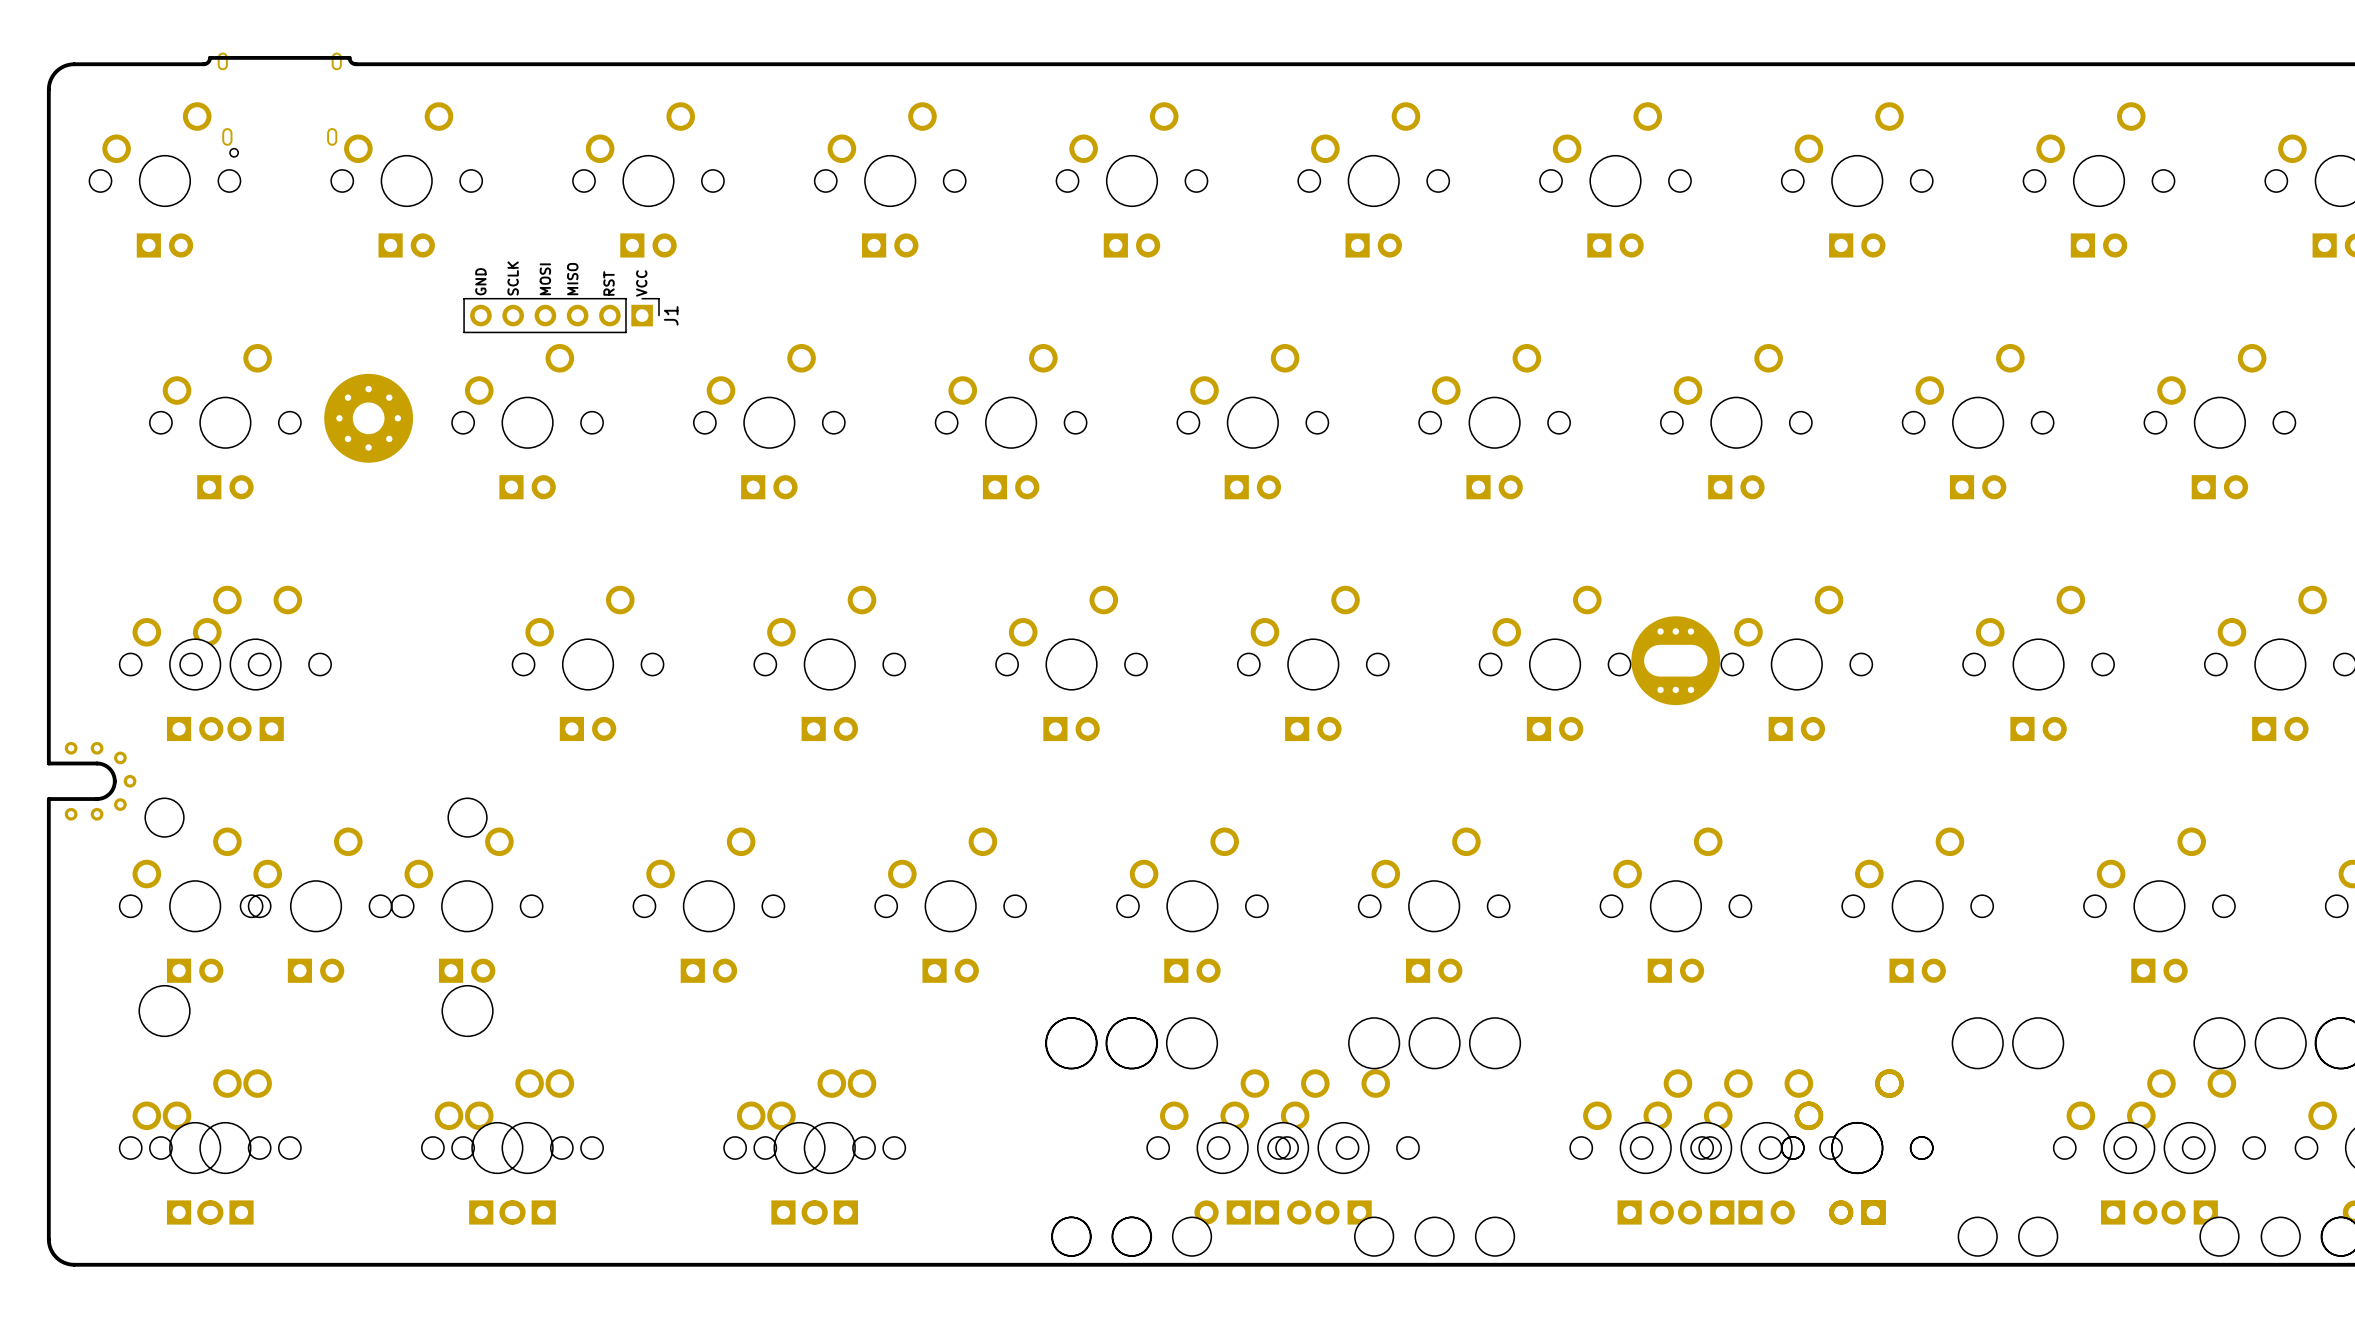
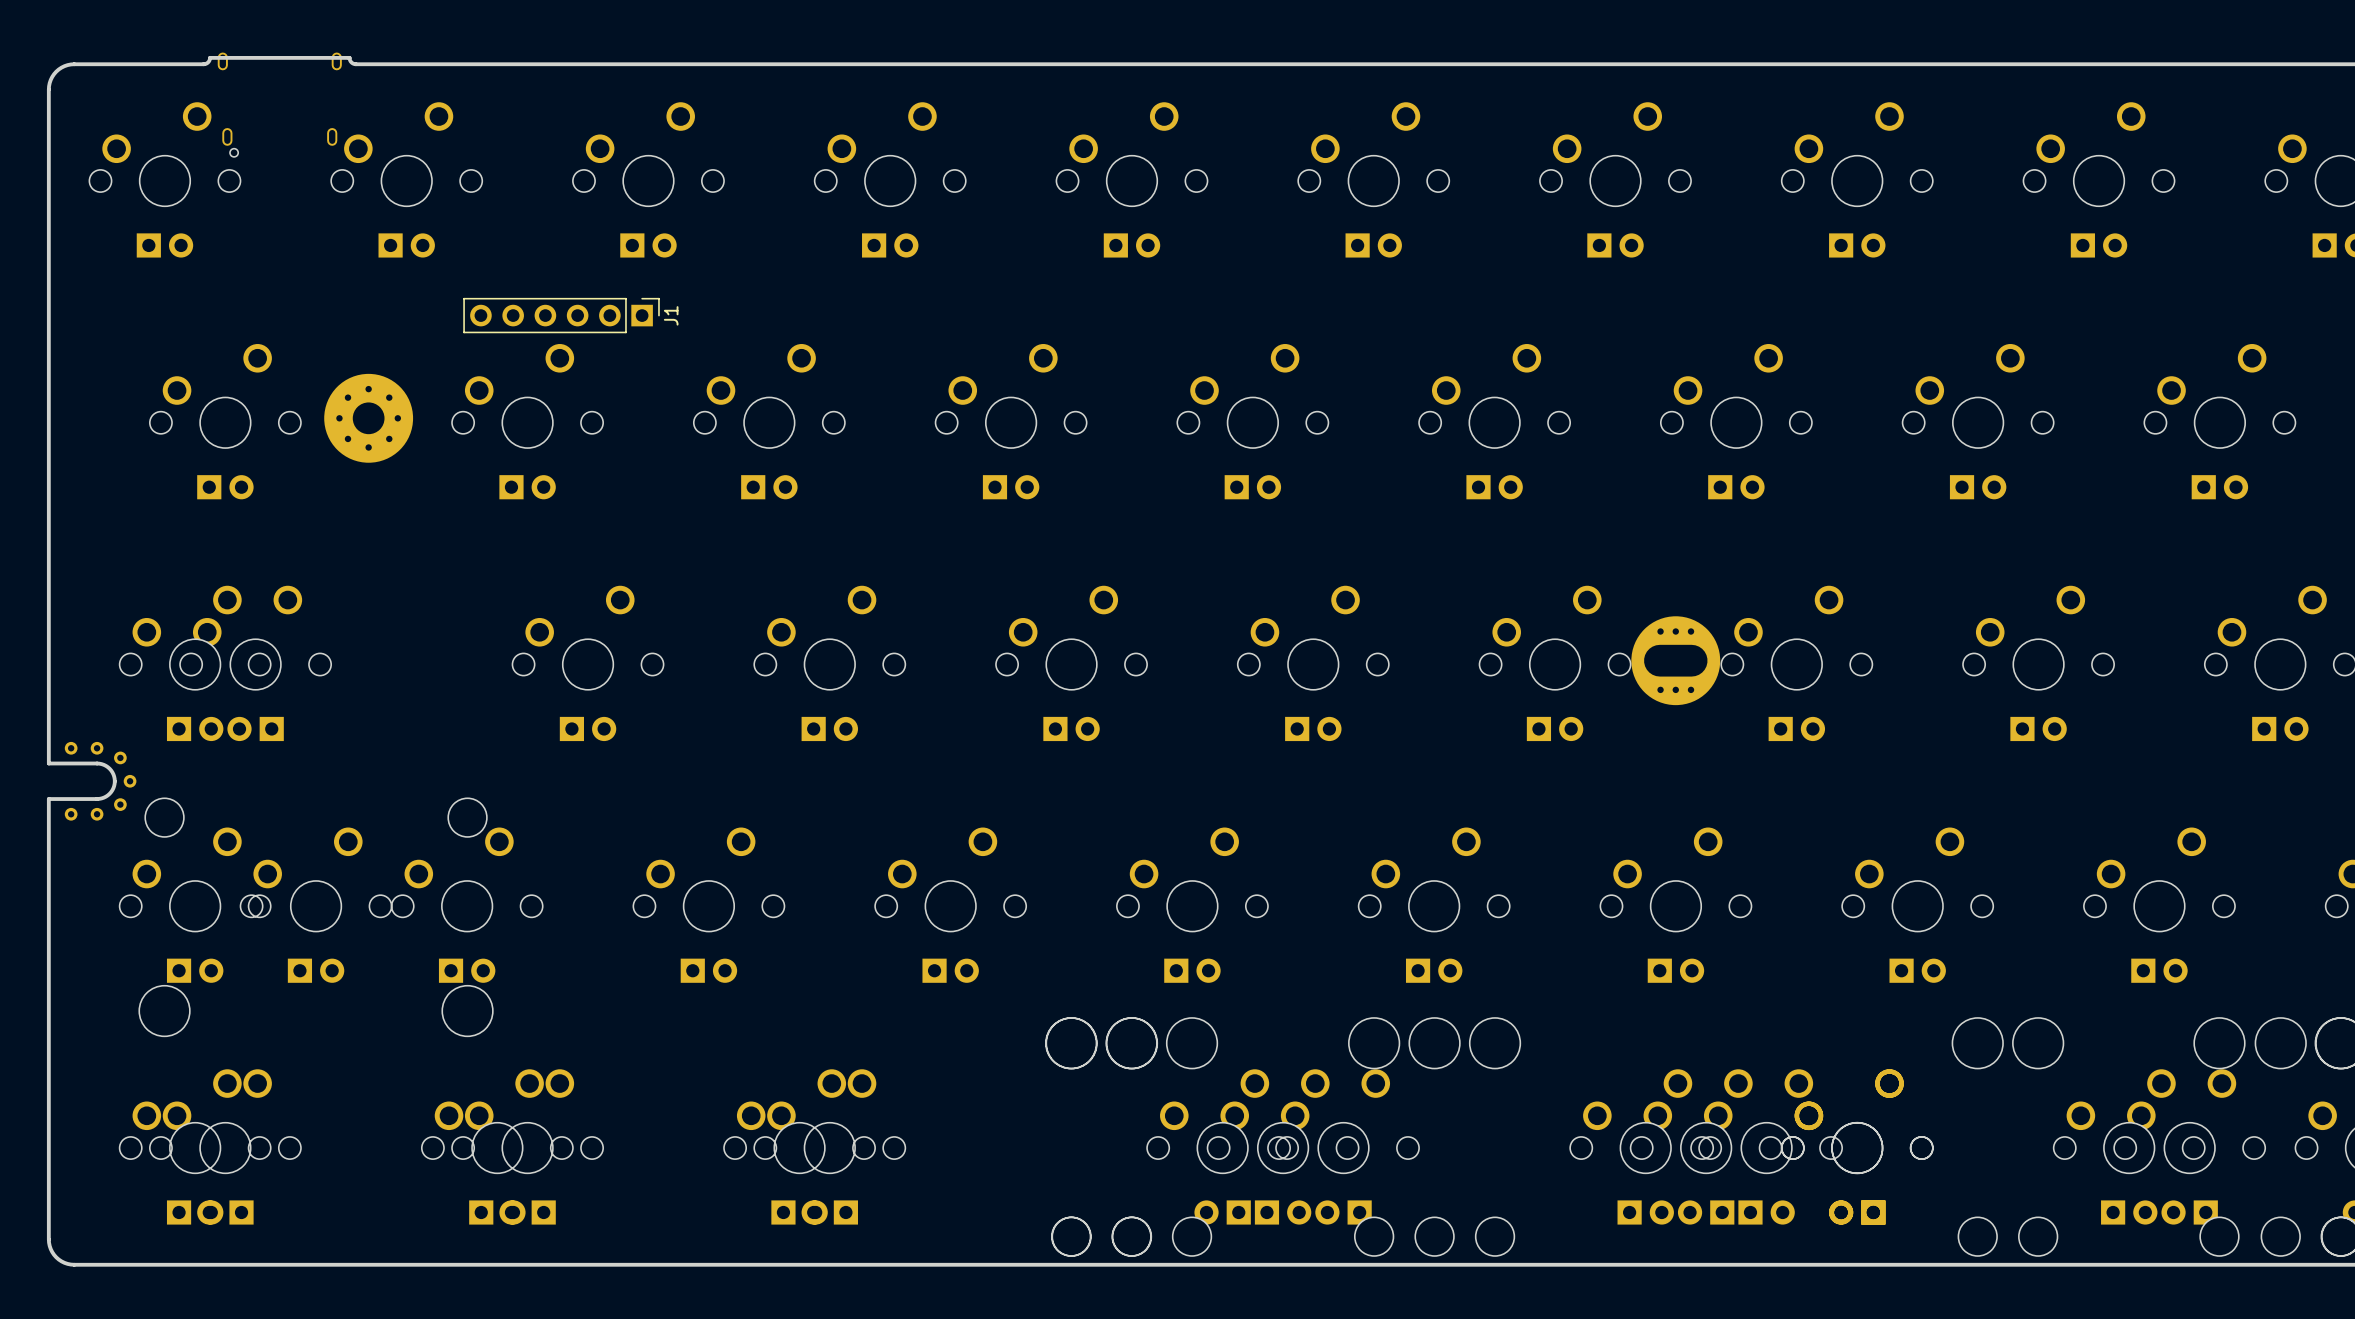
text: SCLK (513, 278) -> none
text: MOSI (545, 279) -> none
text: MISO (572, 279) -> none
text: GND (480, 281) -> none
text: RST (609, 283) -> none
text: VCC (641, 283) -> none

